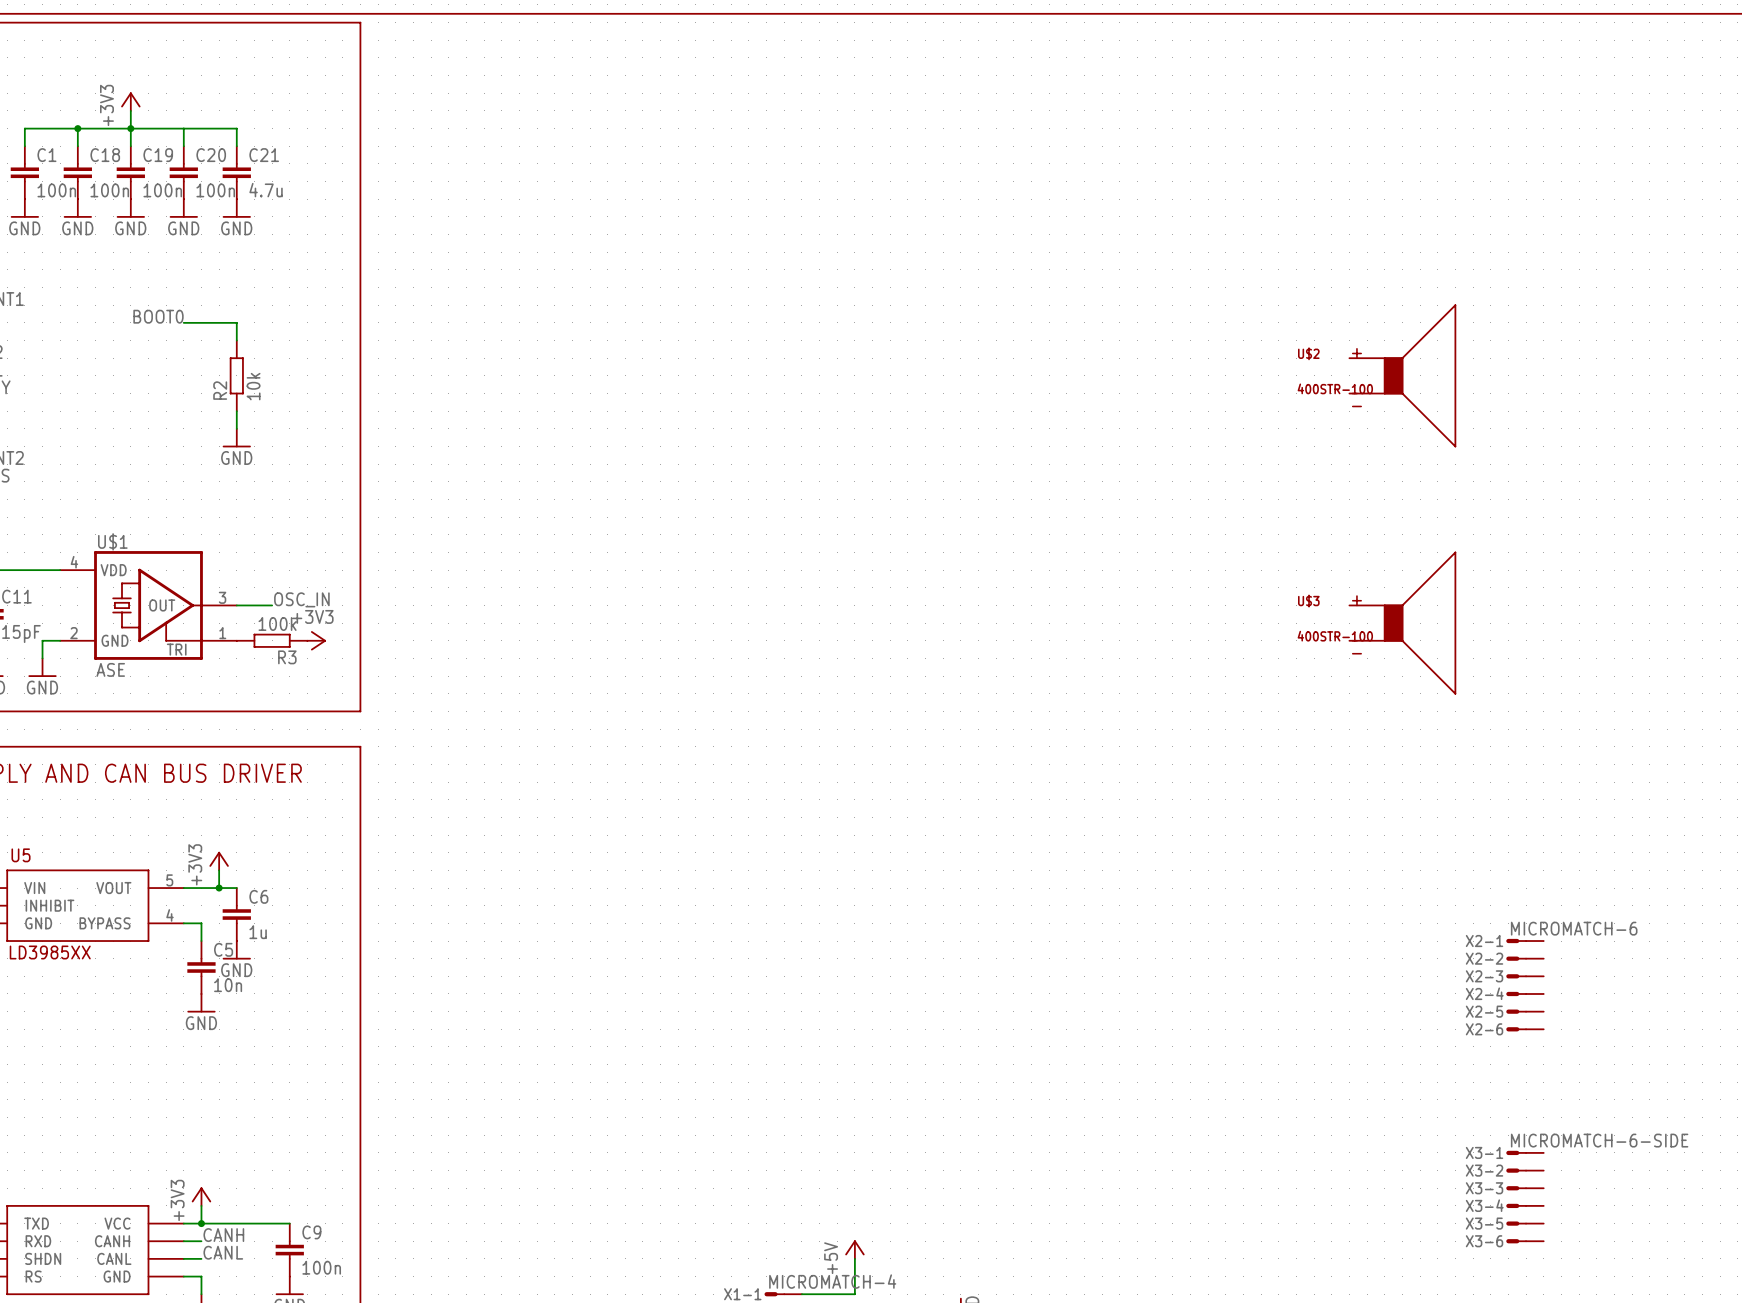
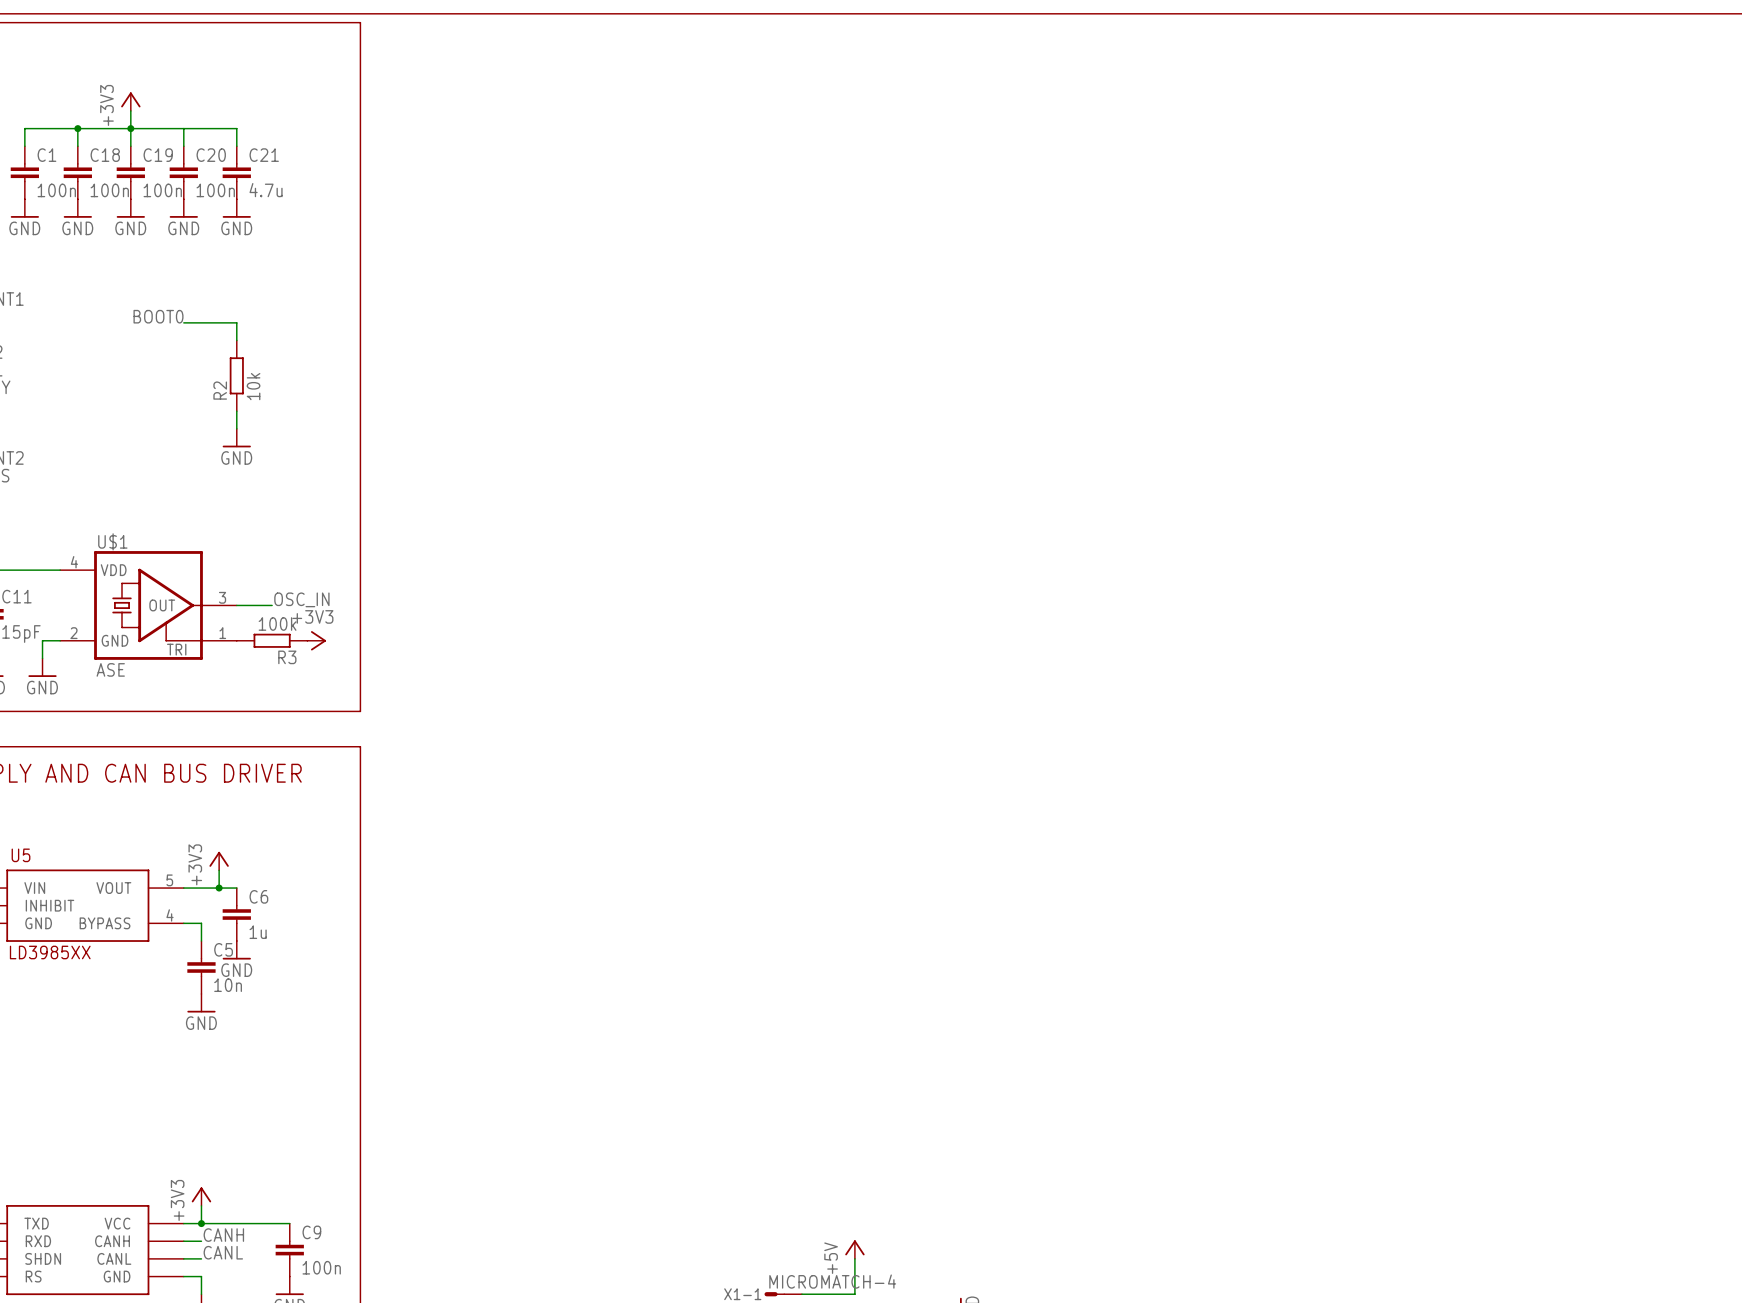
U$2: 400STR-100 (1402, 375) -> none
U$3: 400STR-100 (1402, 623) -> none
X2-1: MICROMATCH-6 (1524, 941) -> none
X2-2: (1524, 958) -> none
X2-3: (1524, 976) -> none
X2-4: (1524, 993) -> none
X2-5: (1524, 1011) -> none
X2-6: (1524, 1029) -> none
X3-1: MICROMATCH-6-SIDE (1524, 1152) -> none
X3-2: (1524, 1170) -> none
X3-3: (1524, 1188) -> none
X3-4: (1524, 1205) -> none
X3-5: (1524, 1223) -> none
X3-6: (1524, 1241) -> none

